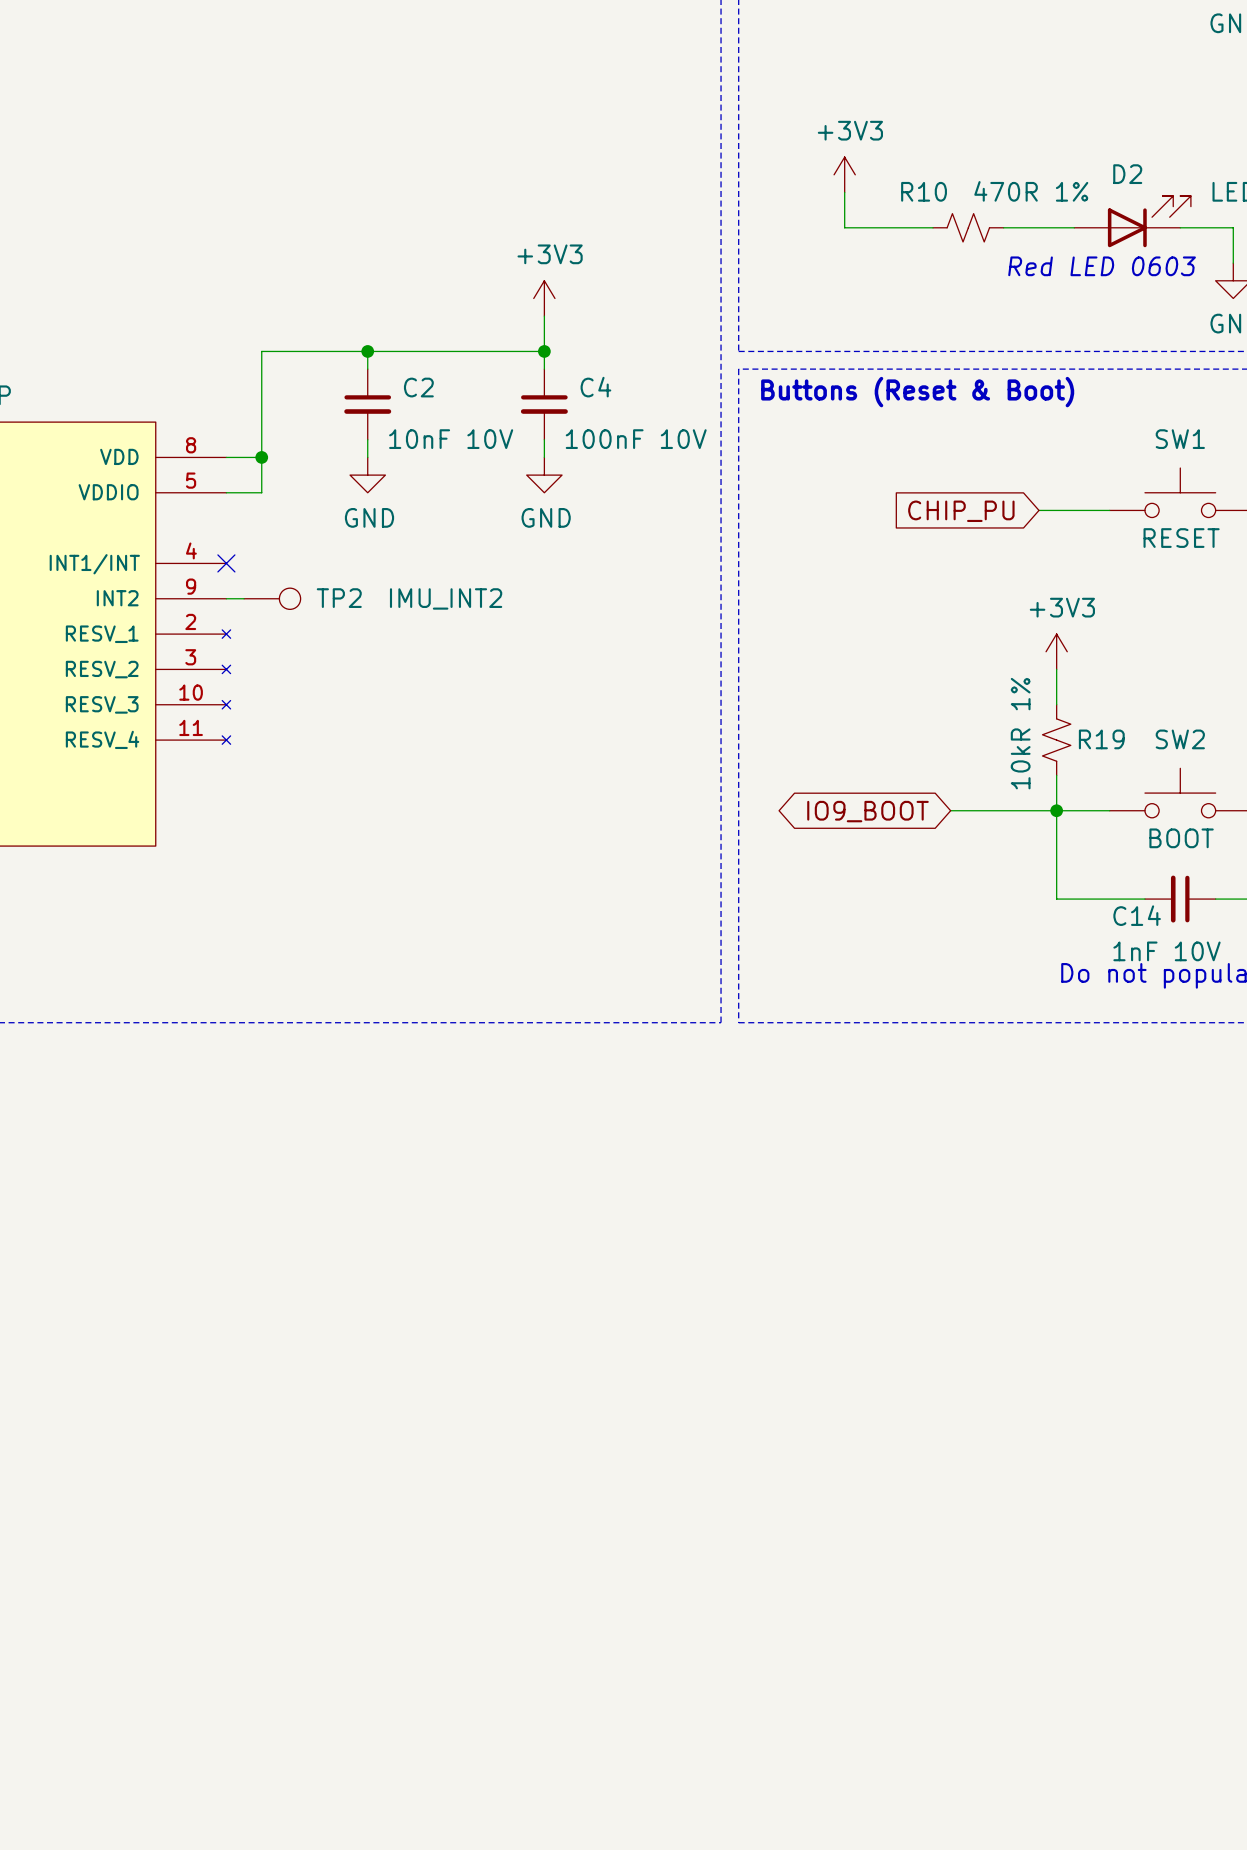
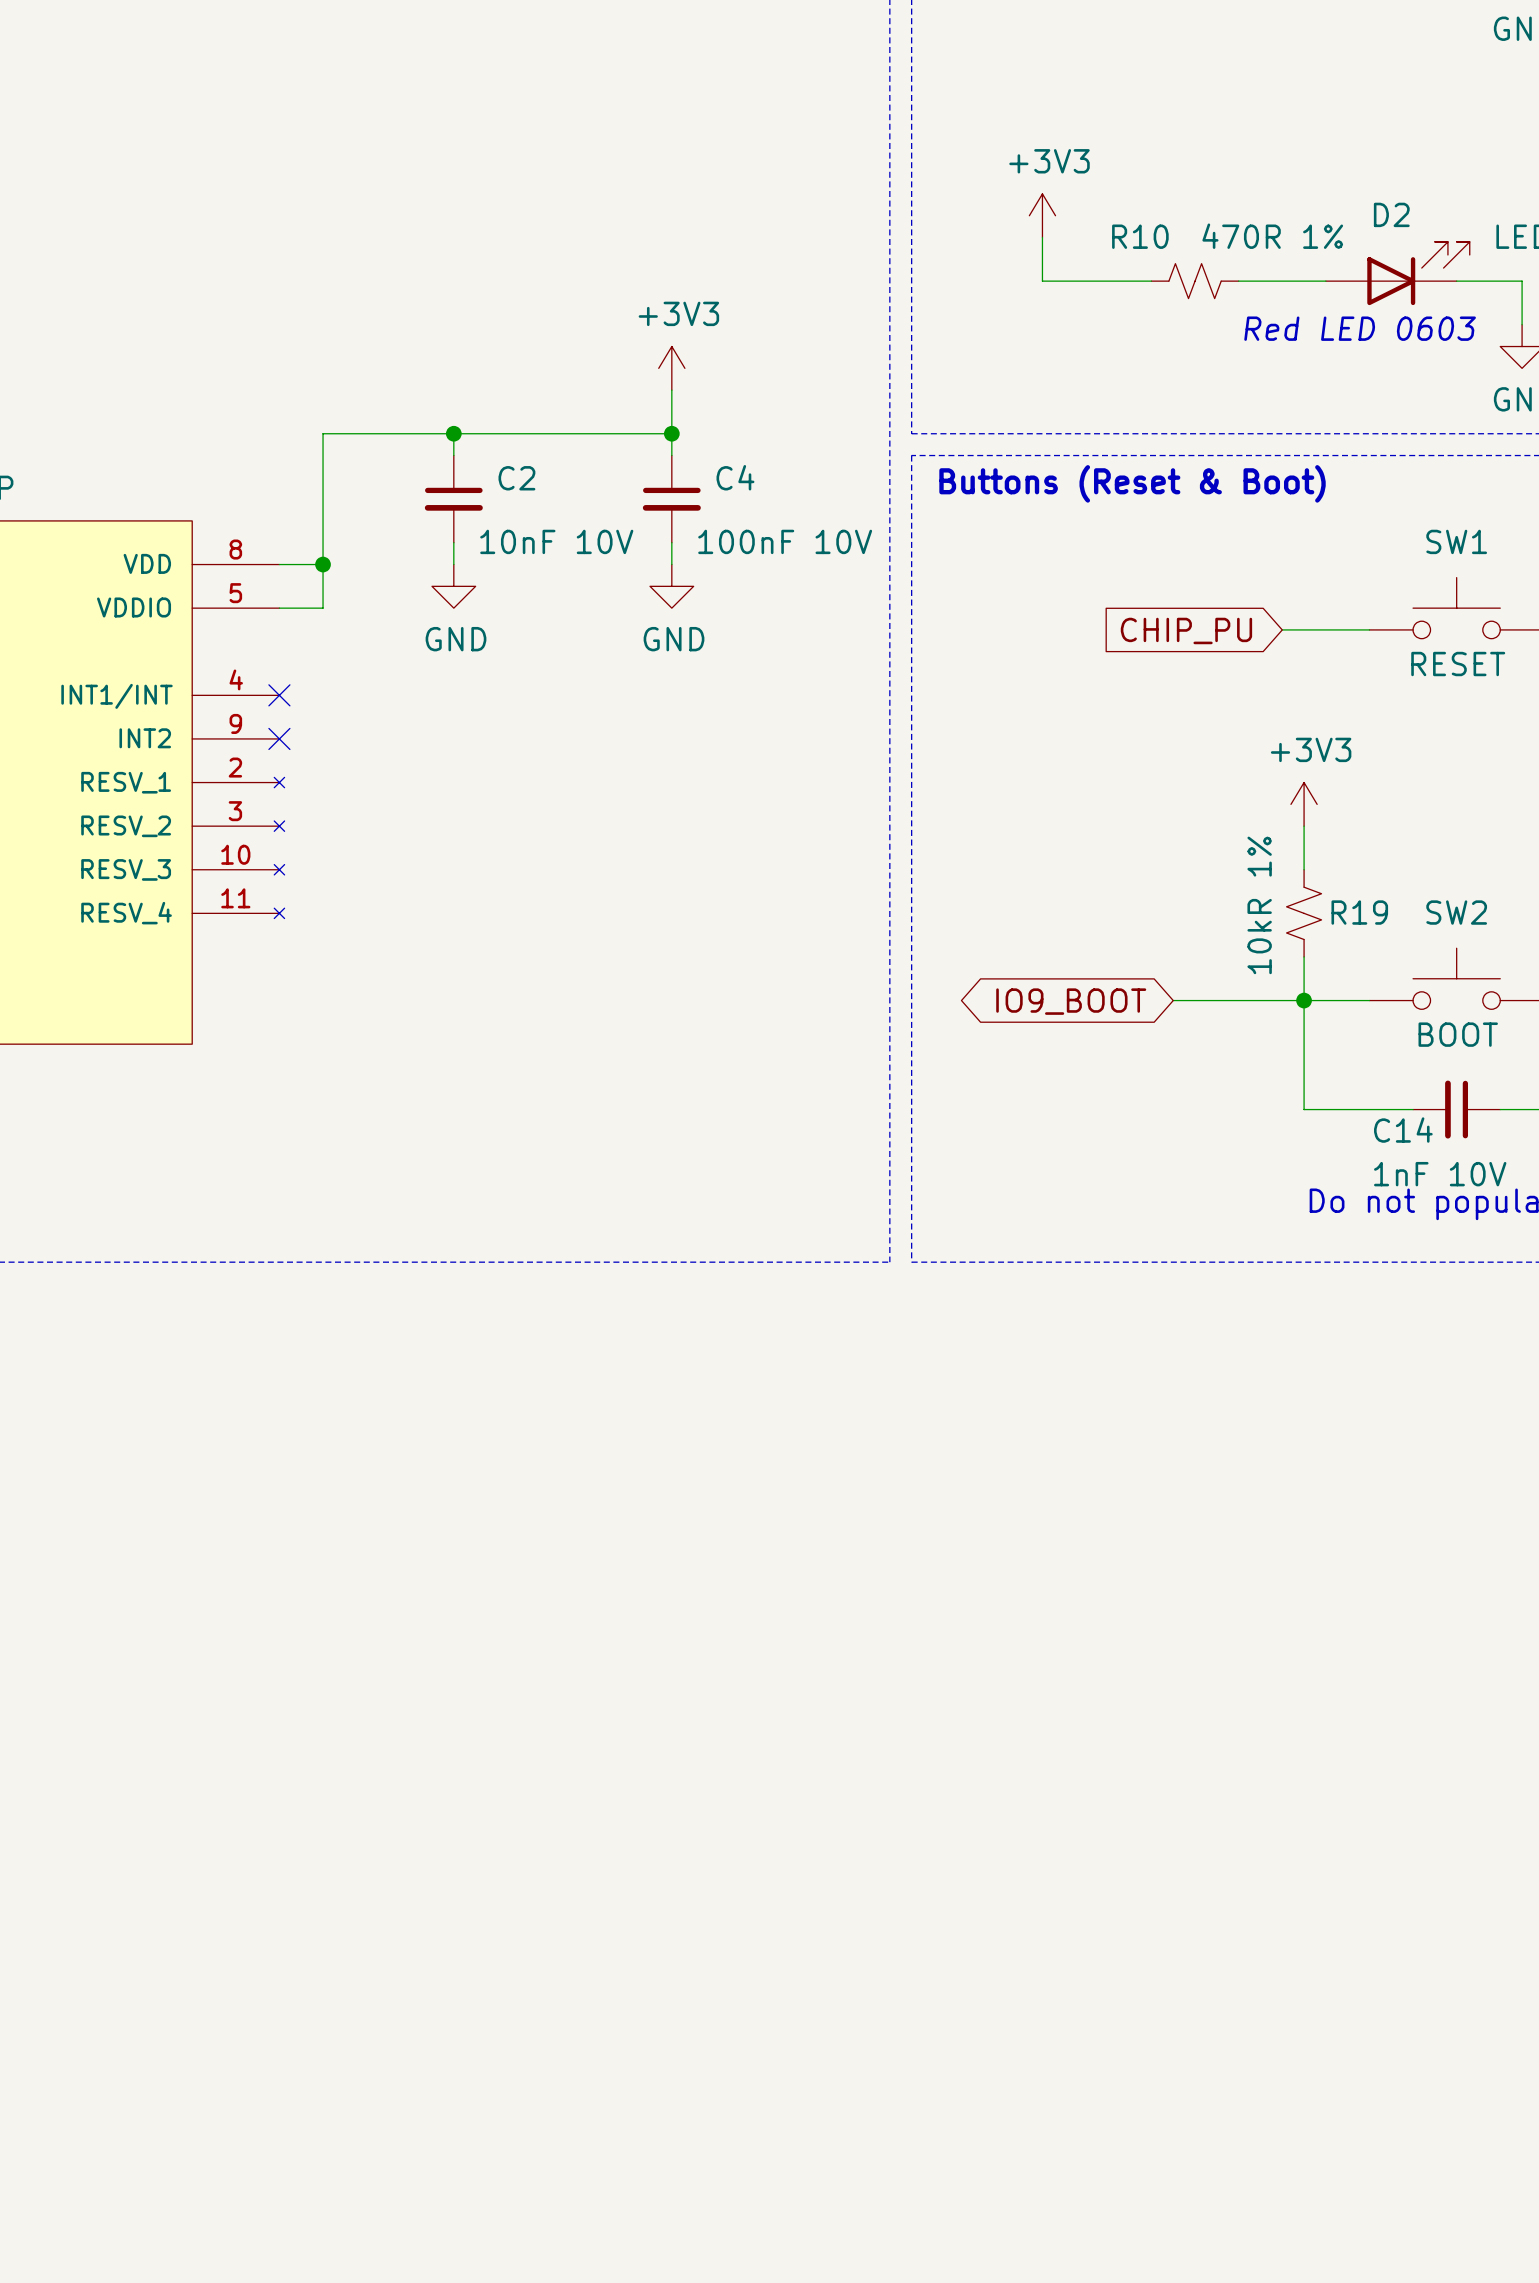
wire: (226, 598) (244, 598) -> none
no-connect mark: none -> (279, 738)
TP2: IMU_INT2 (272, 598) -> none

